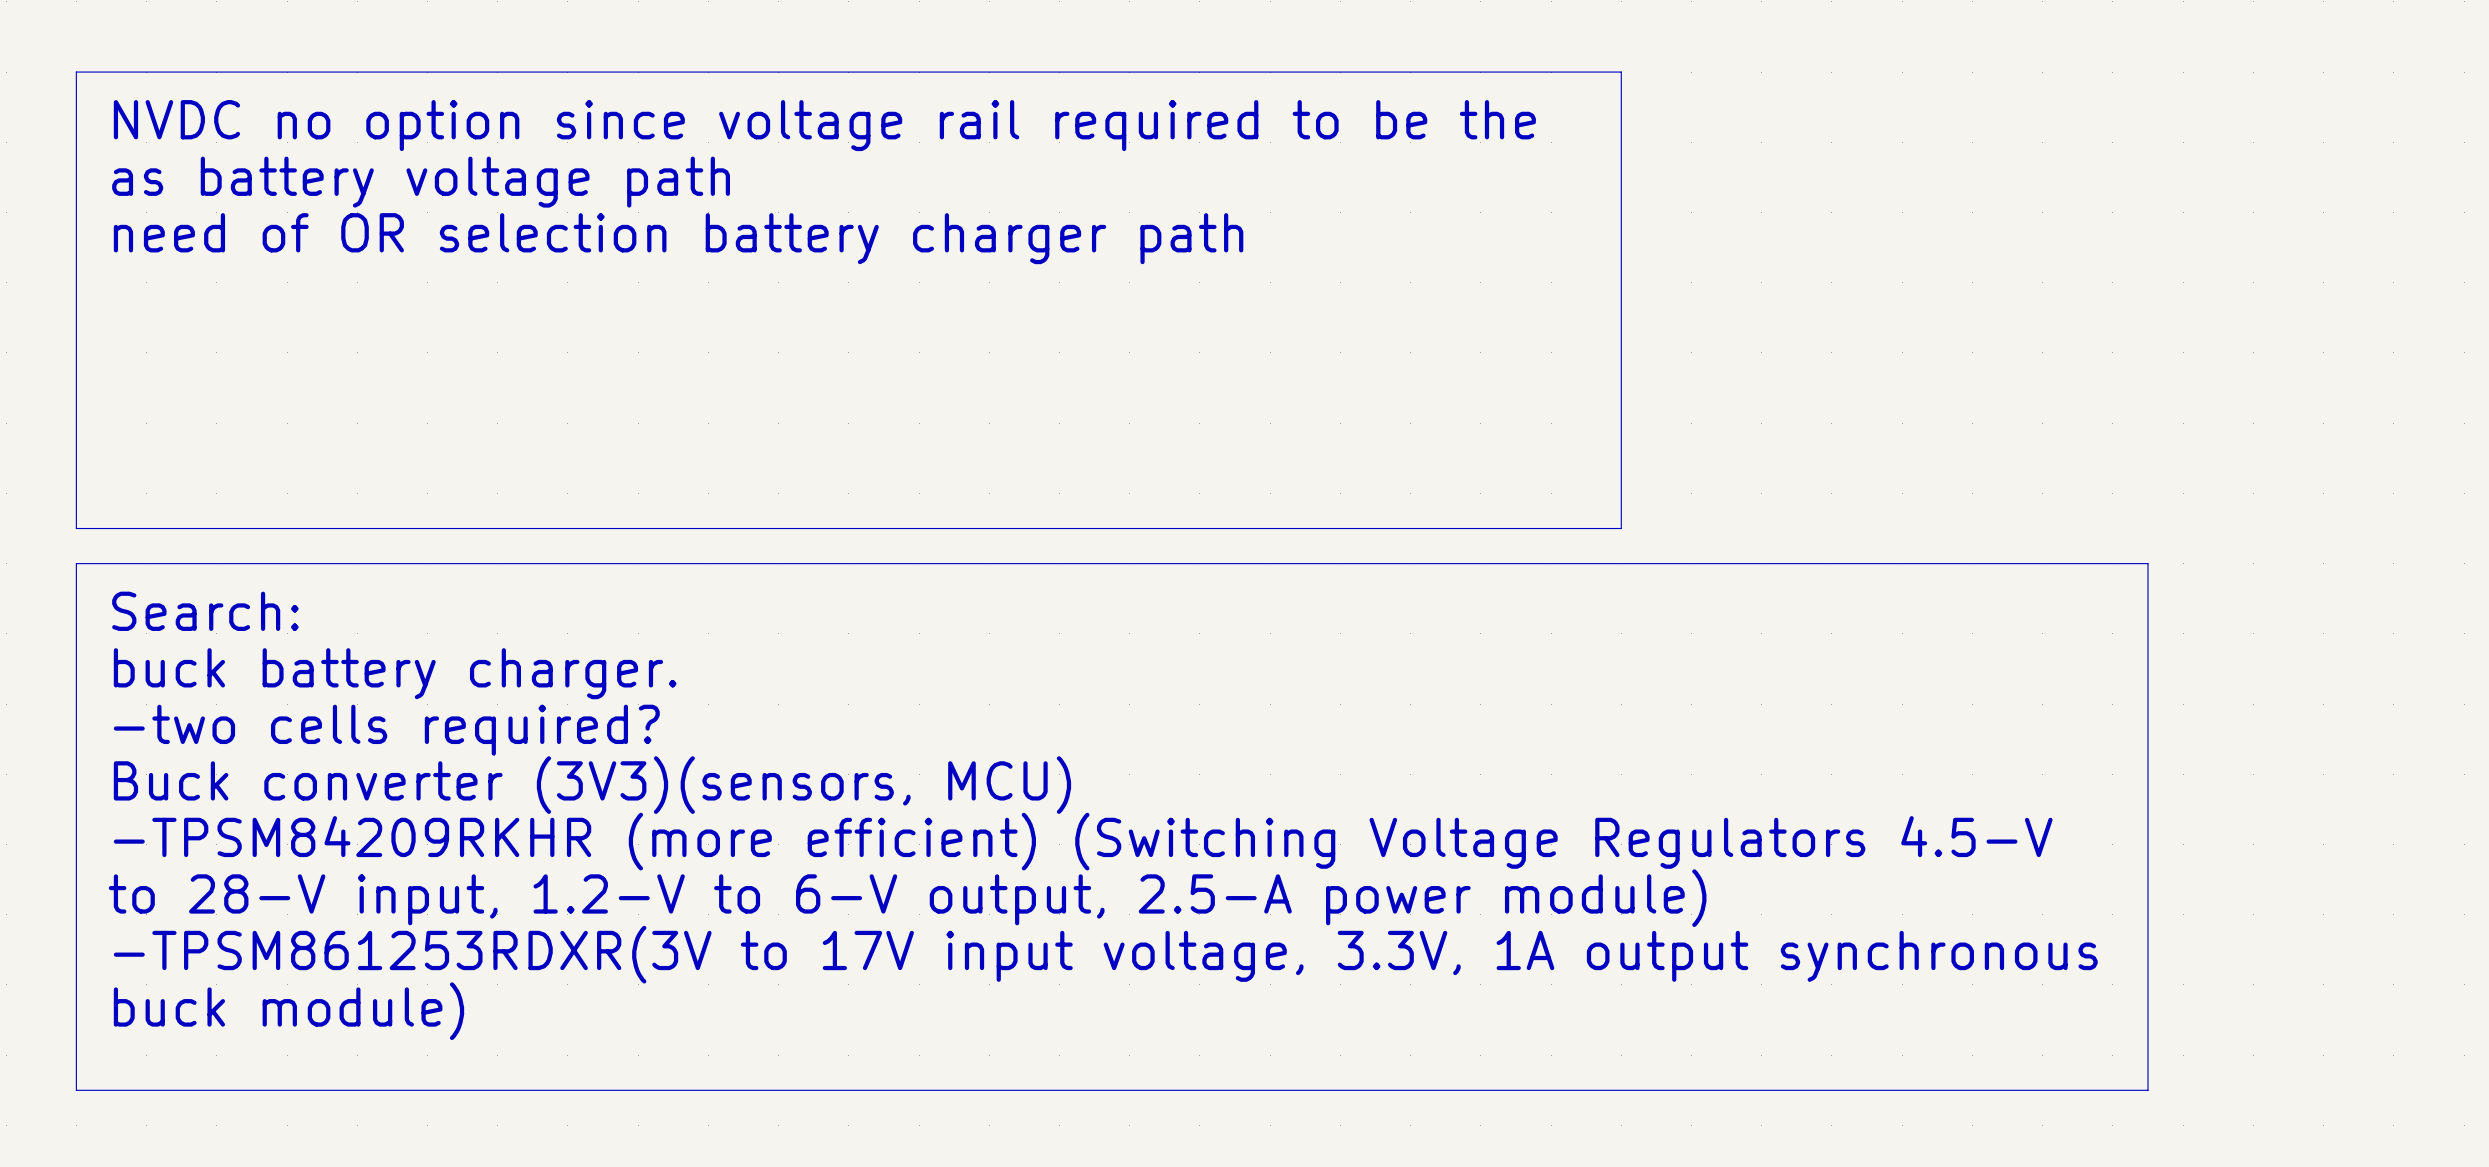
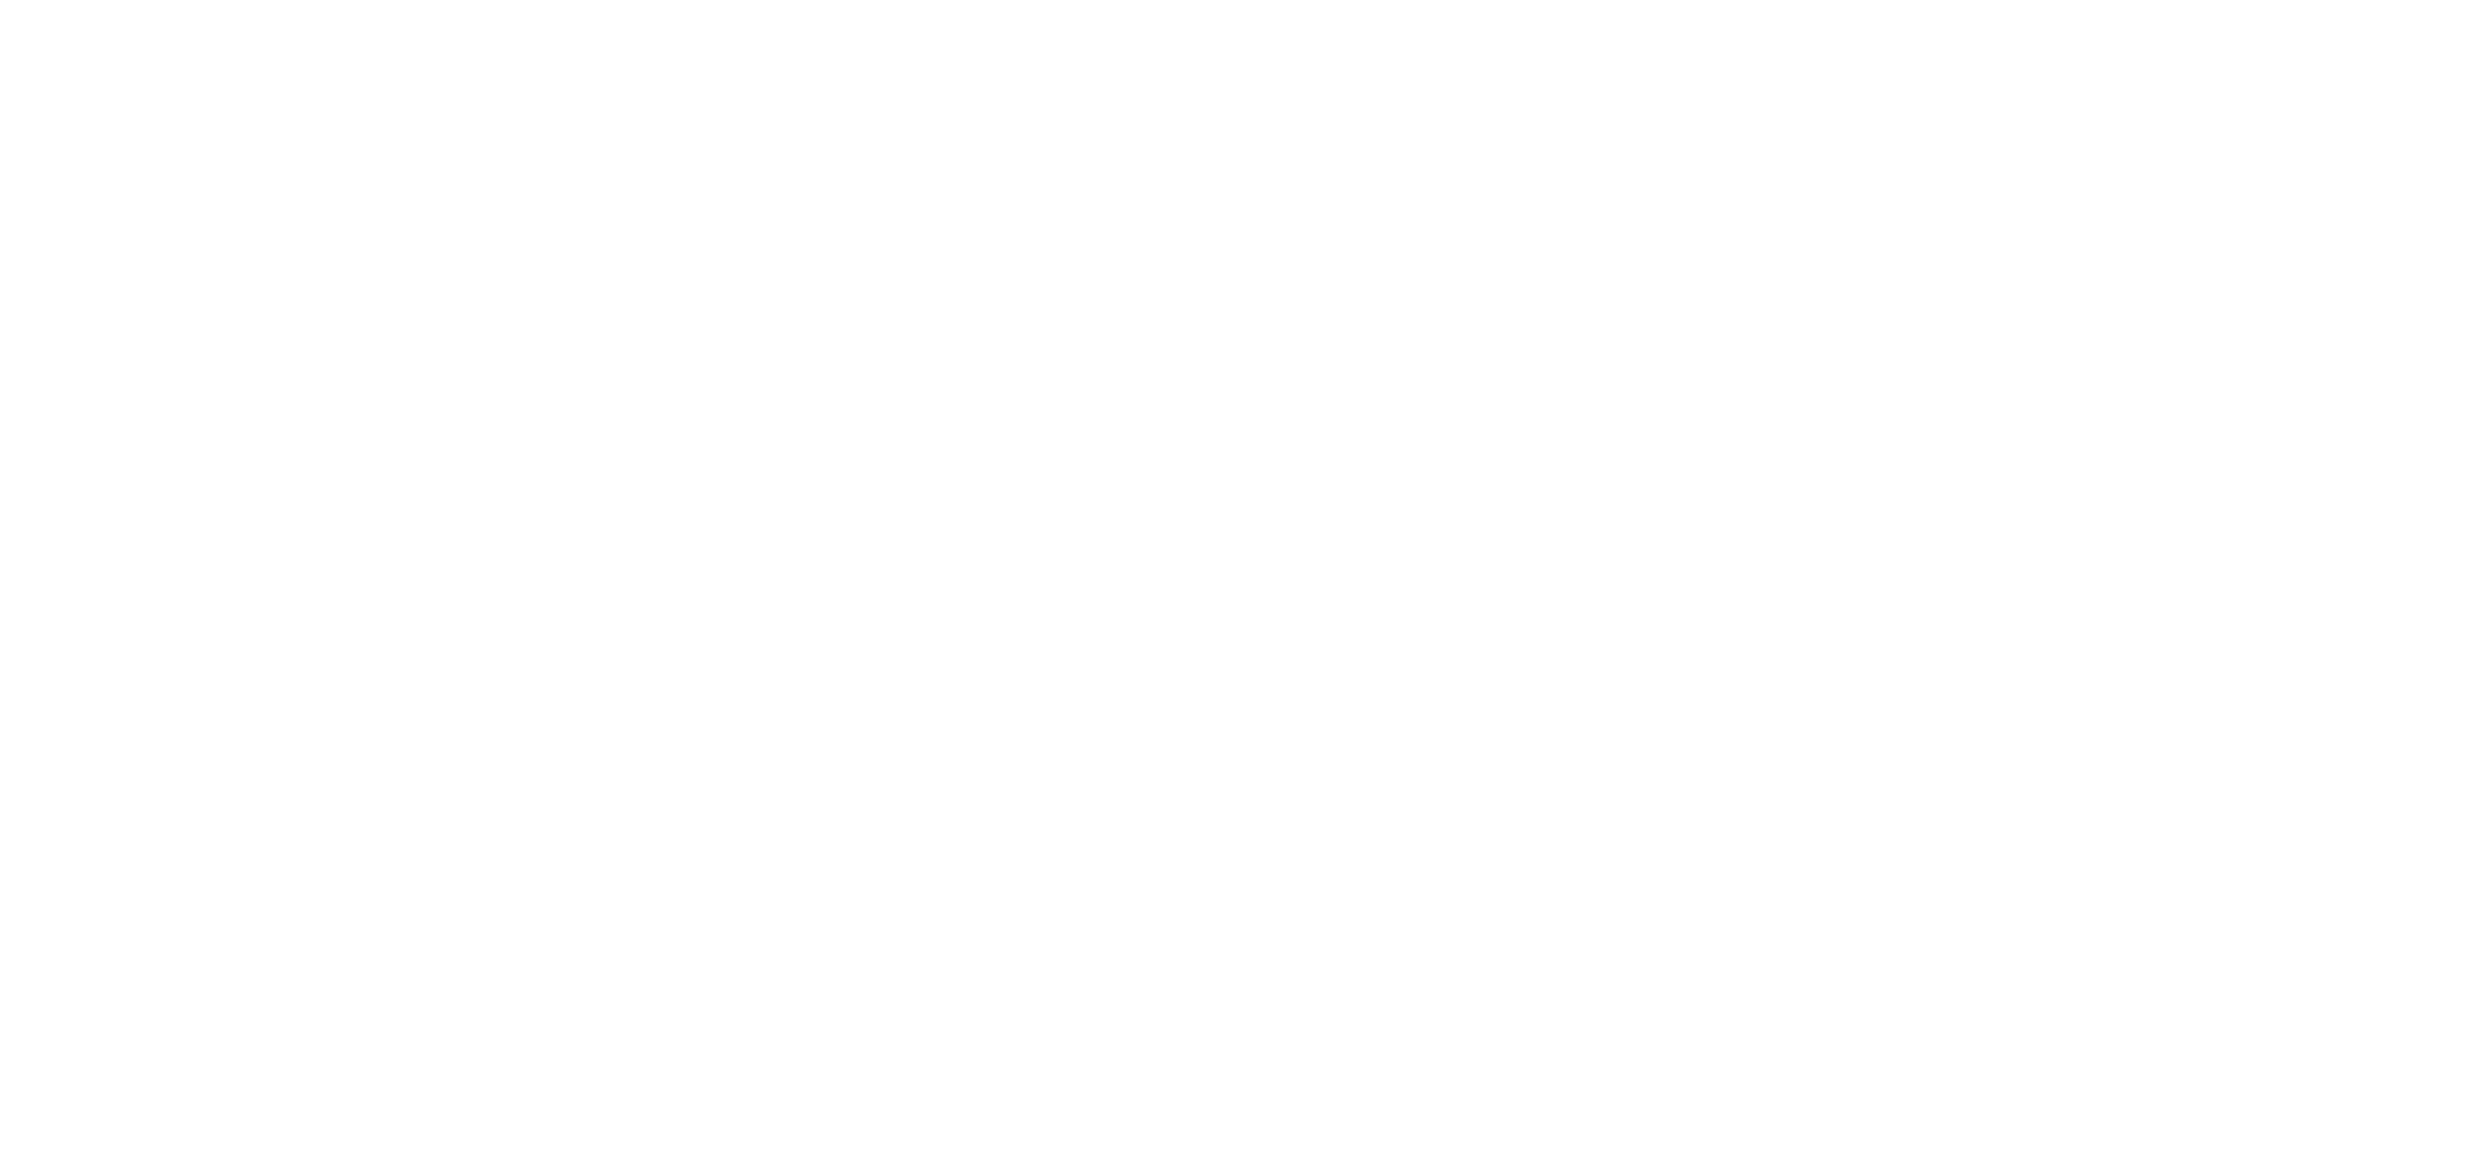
line: (76, 72) (1621, 72) (1621, 528) (76, 528) (76, 72) -> none
text: NVDC no option since voltage rail required to be the (824, 125) -> none
text: as battery voltage path (421, 182) -> none
text: need of OR selection battery charger path (678, 238) -> none
line: (76, 563) (76, 1090) (2147, 1090) (2147, 563) (76, 563) -> none
text: Search: (205, 611) -> none
text: buck battery charger. (395, 673) -> none
text: -two cells required? (386, 730) -> none
text: Buck converter (3V3)(sensors, MCU) (592, 785) -> none
text: -TPSM84209RKHR (more efficient) (Switching Voltage Regulators 4.5-V (1083, 841) -> none
text: to 28-V input, 1.2-V to 6-V output, 2.5-A power module) (907, 898) -> none
text: -TPSM861253RDXR(3V to 17V input voltage, 3.3V, 1A output synchronous (1105, 954) -> none
text: buck module) (288, 1011) -> none

